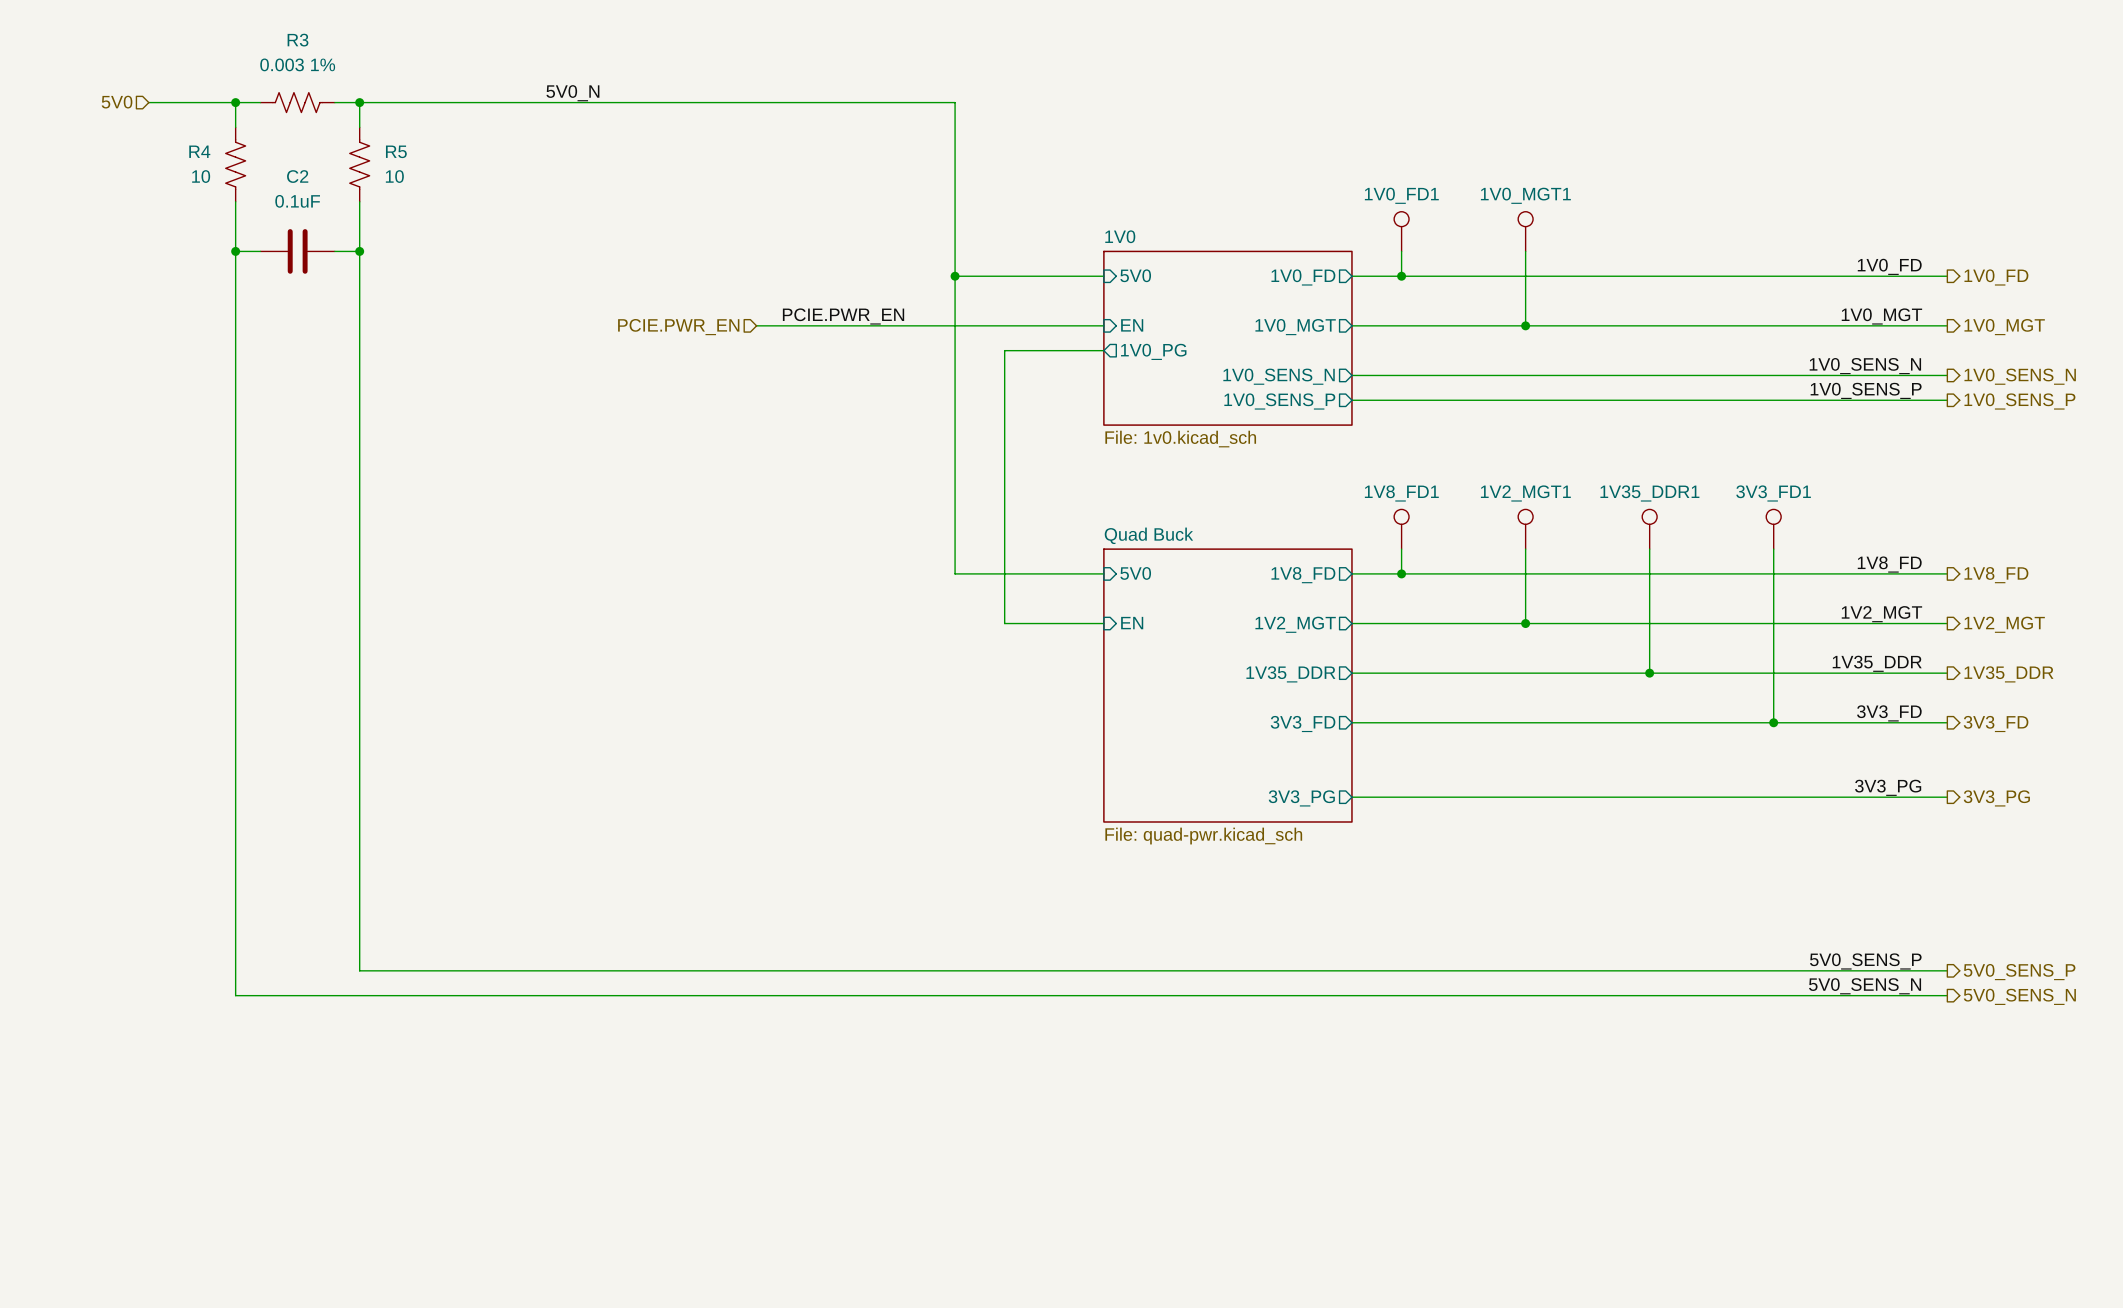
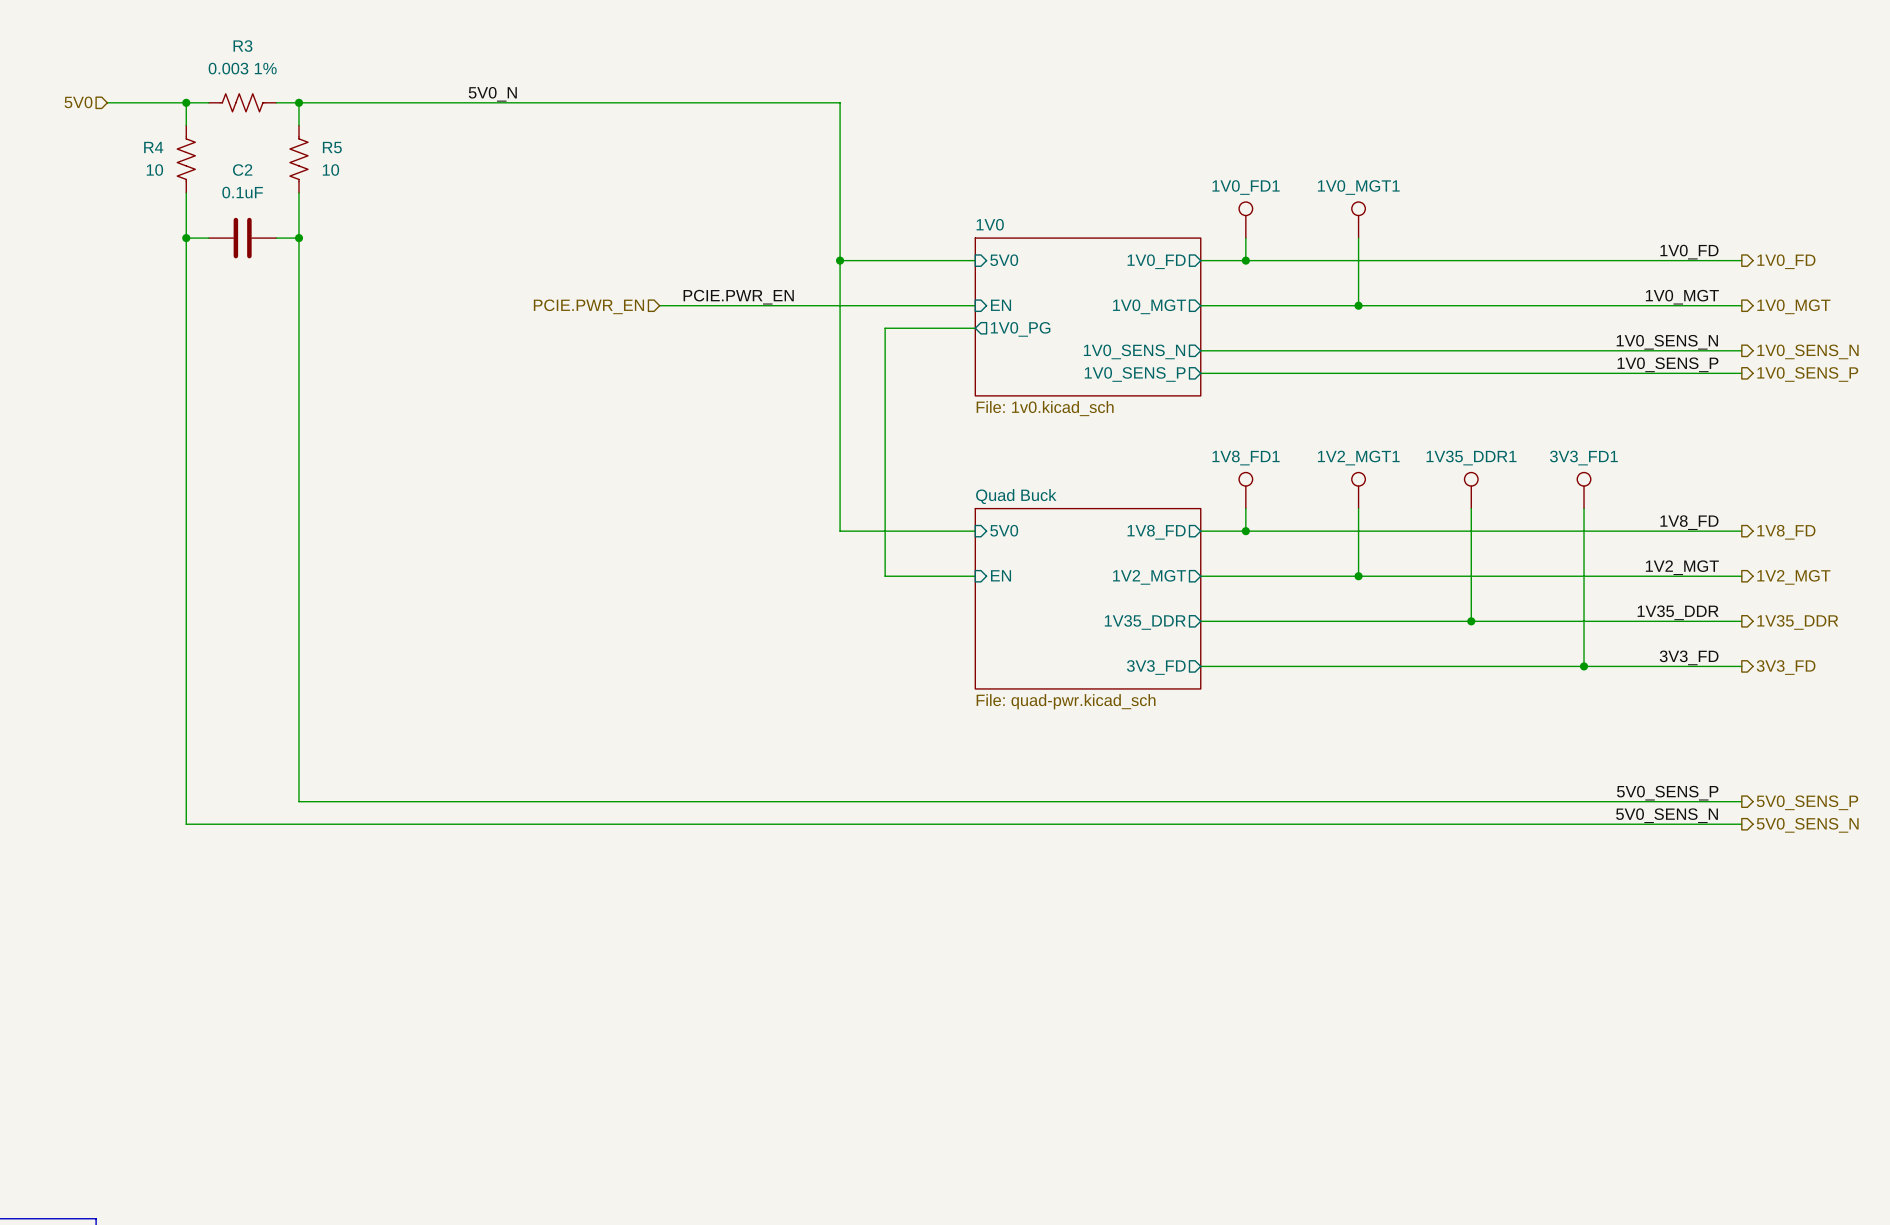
sheet Quad Buck: none -> File: quad-pwr.kicad_sch (1088, 598)
sheet Quad Buck: File: quad-pwr.kicad_sch (1227, 685) -> none
label: 3V3_PG (1888, 787) -> none
wire: (1351, 797) (1947, 797) -> none
sheet pin: 3V3_PG (1301, 798) -> none
hierarchical label: 3V3_PG (1996, 798) -> none
wire: (359, 871) (359, 970) (1947, 970) -> (298, 801) (1741, 801)
wire: (235, 896) (235, 995) (1947, 995) -> (186, 824) (1741, 824)
label position: 5V0_SENS_P (1865, 961) -> 5V0_SENS_P (1667, 793)
hierarchical label position: 5V0_SENS_P (2019, 972) -> 5V0_SENS_P (1807, 802)
label position: 5V0_SENS_N (1865, 986) -> 5V0_SENS_N (1667, 815)
hierarchical label position: 5V0_SENS_N (2019, 996) -> 5V0_SENS_N (1807, 825)

